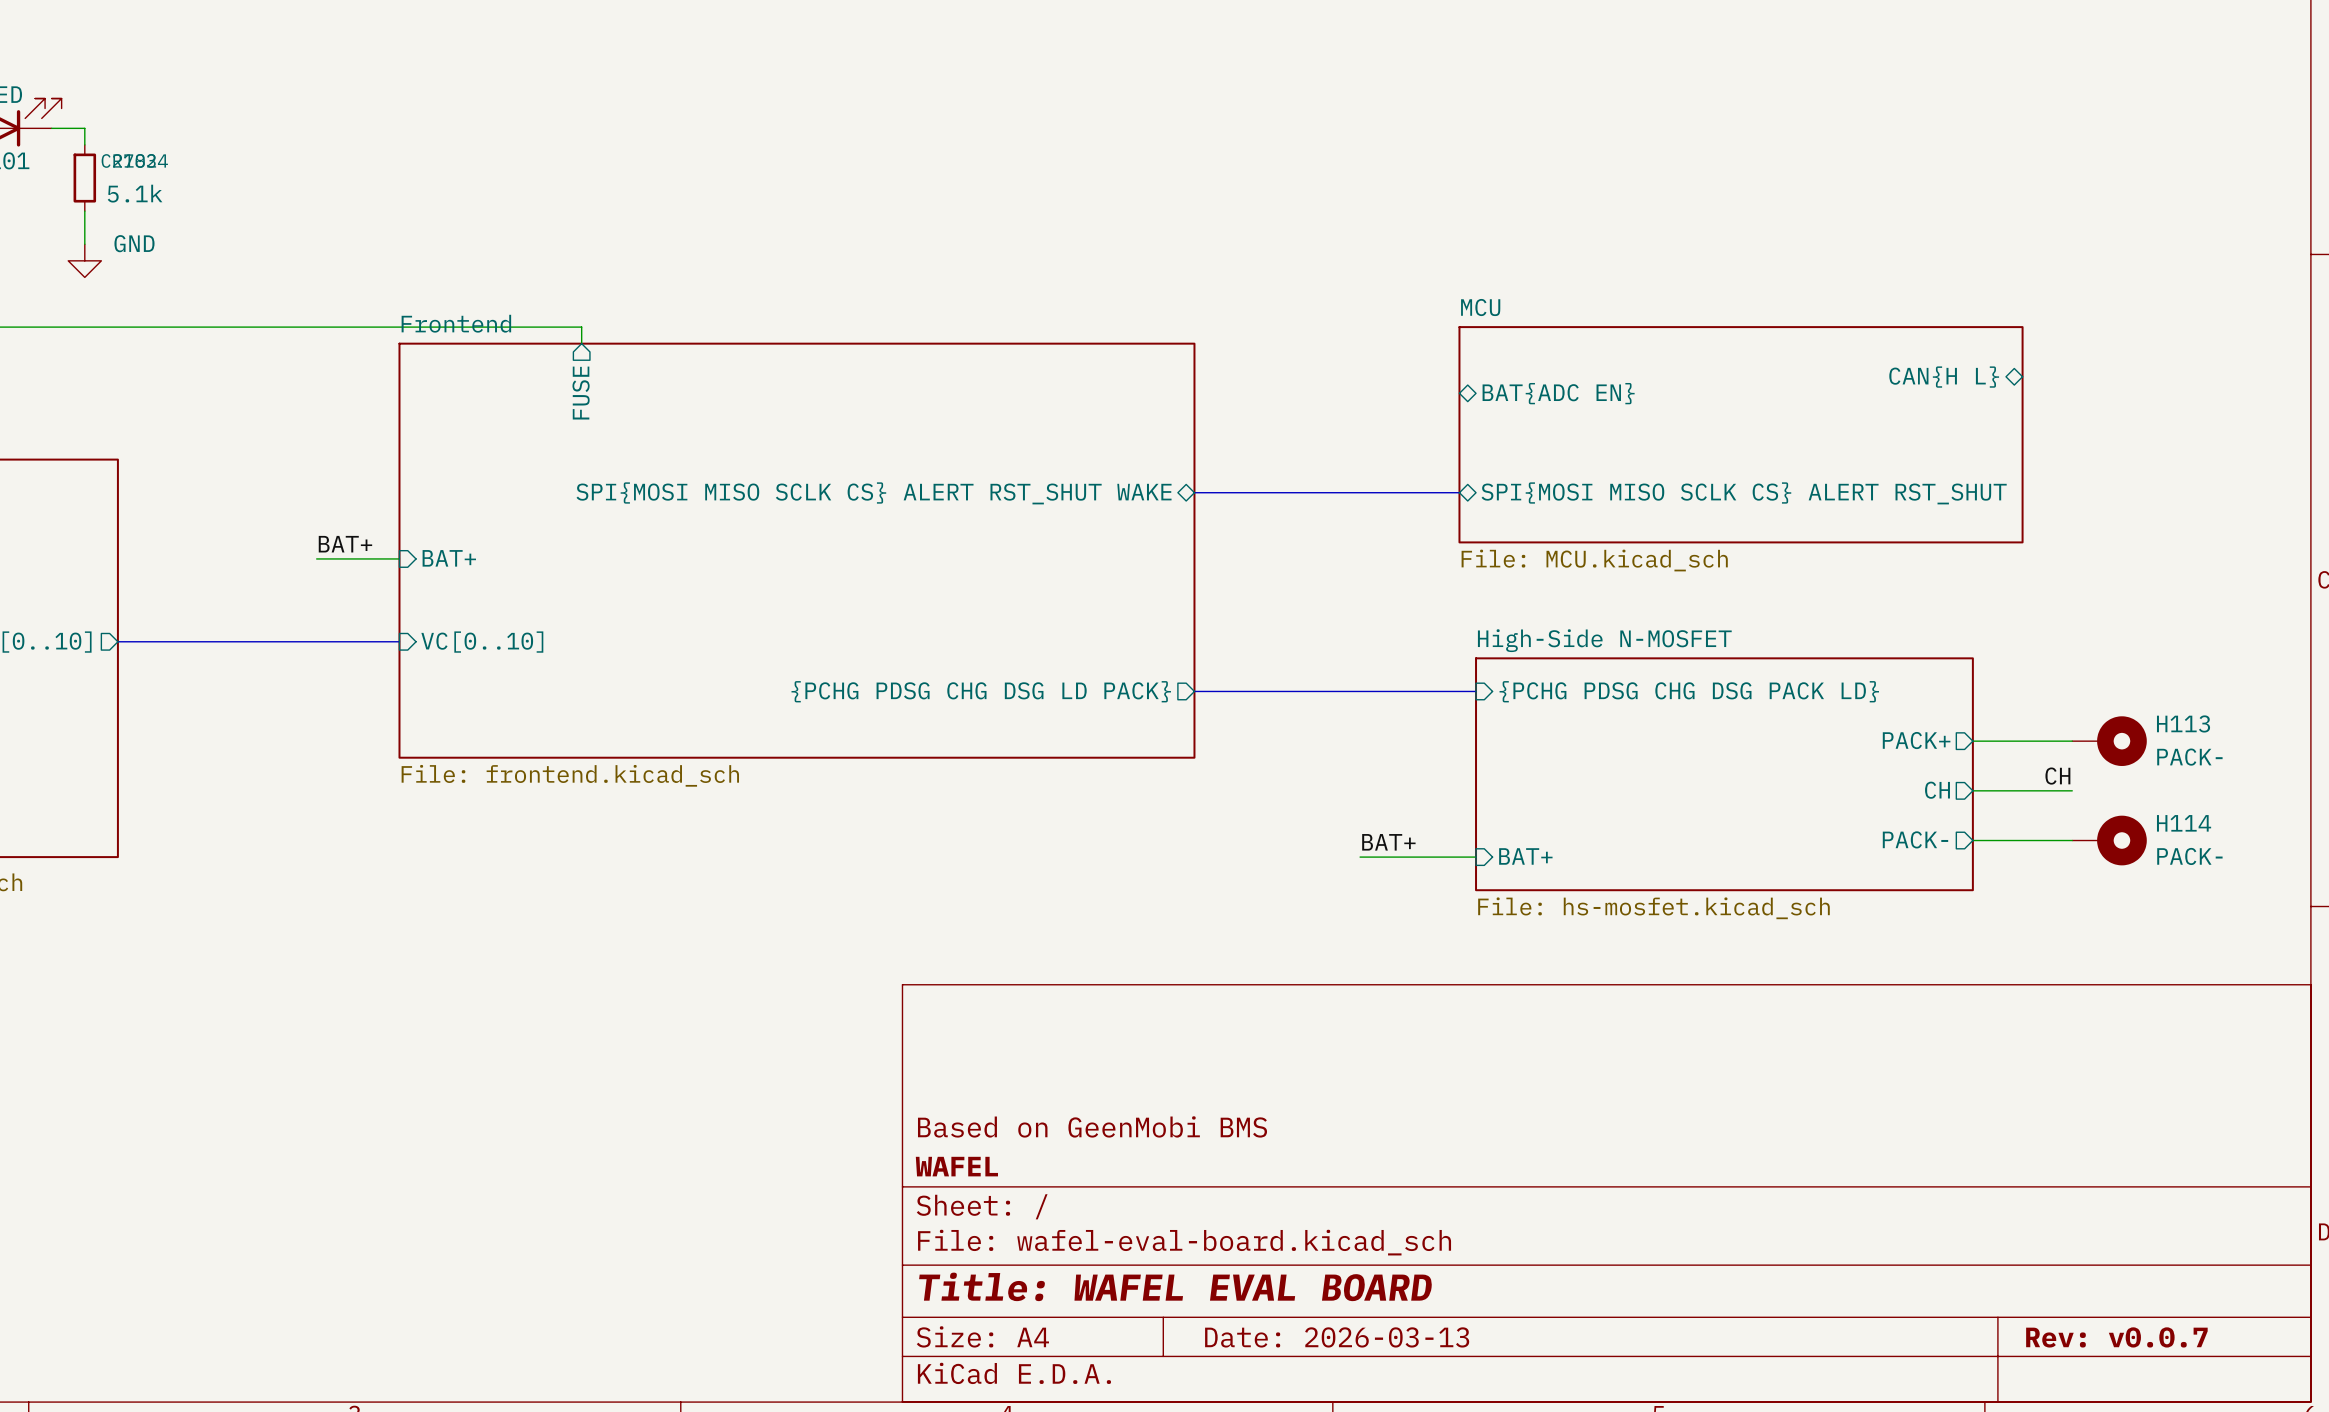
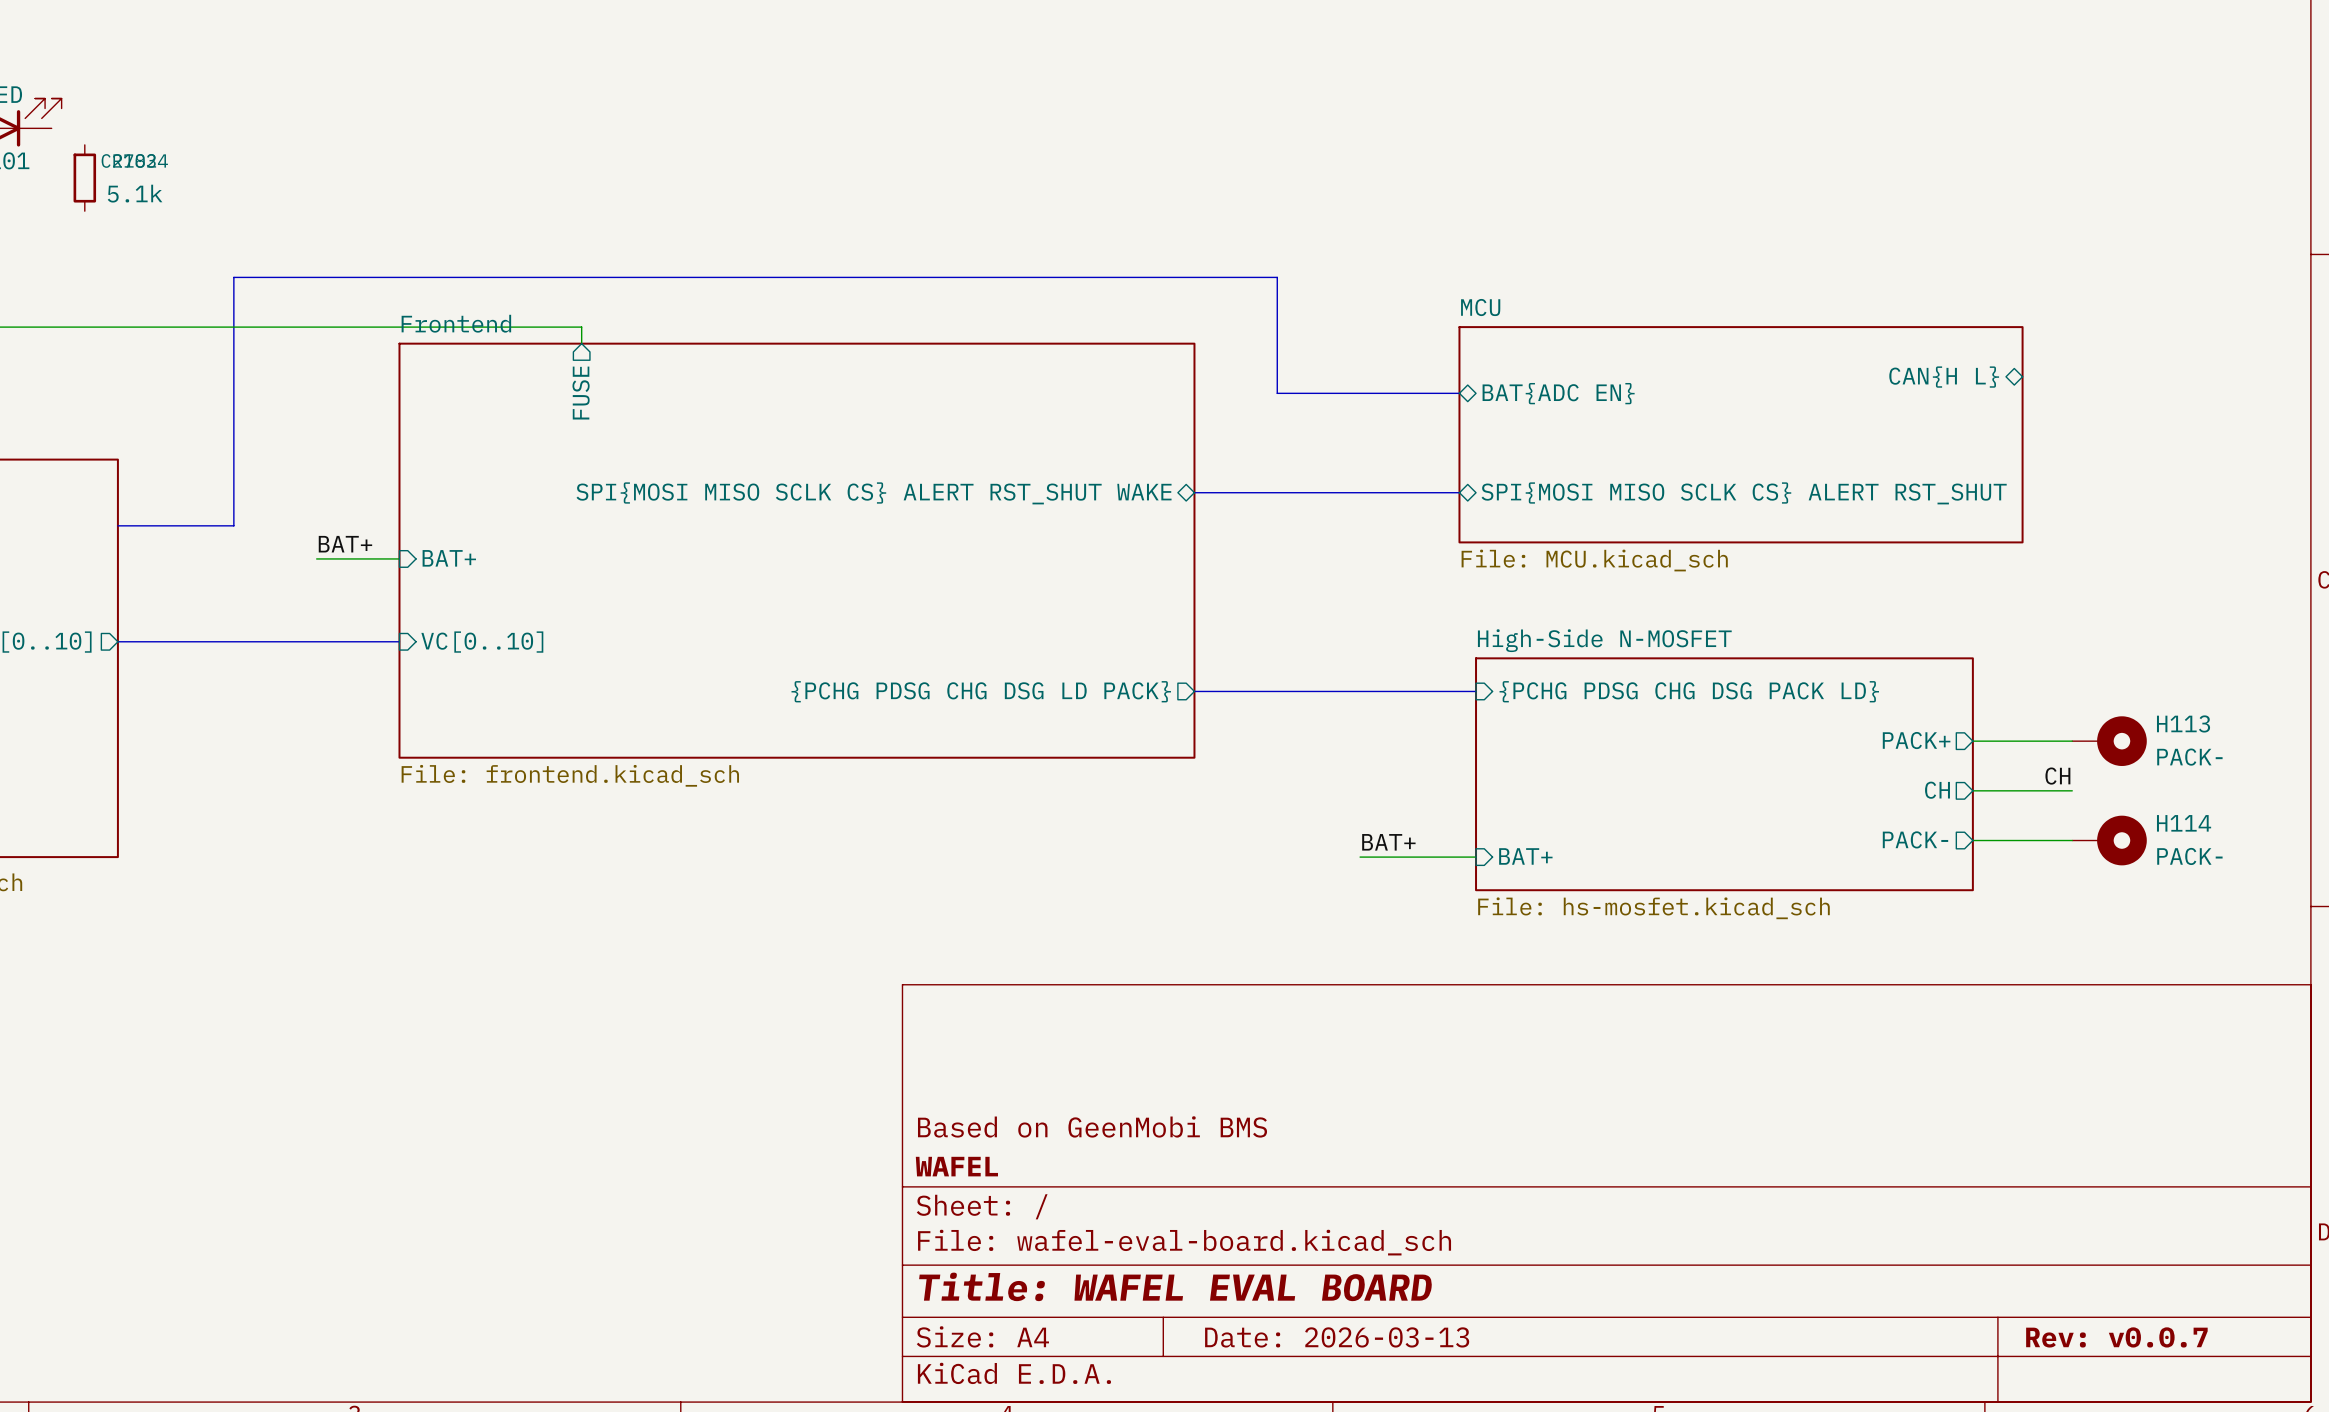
wire: (51, 128) (84, 128) (84, 144) -> none
wire: (84, 211) (84, 244) -> none
power symbol: GND (84, 260) -> none
bus: none -> (1459, 393) (1277, 393) (1277, 277) (233, 277) (233, 525) (117, 525)

